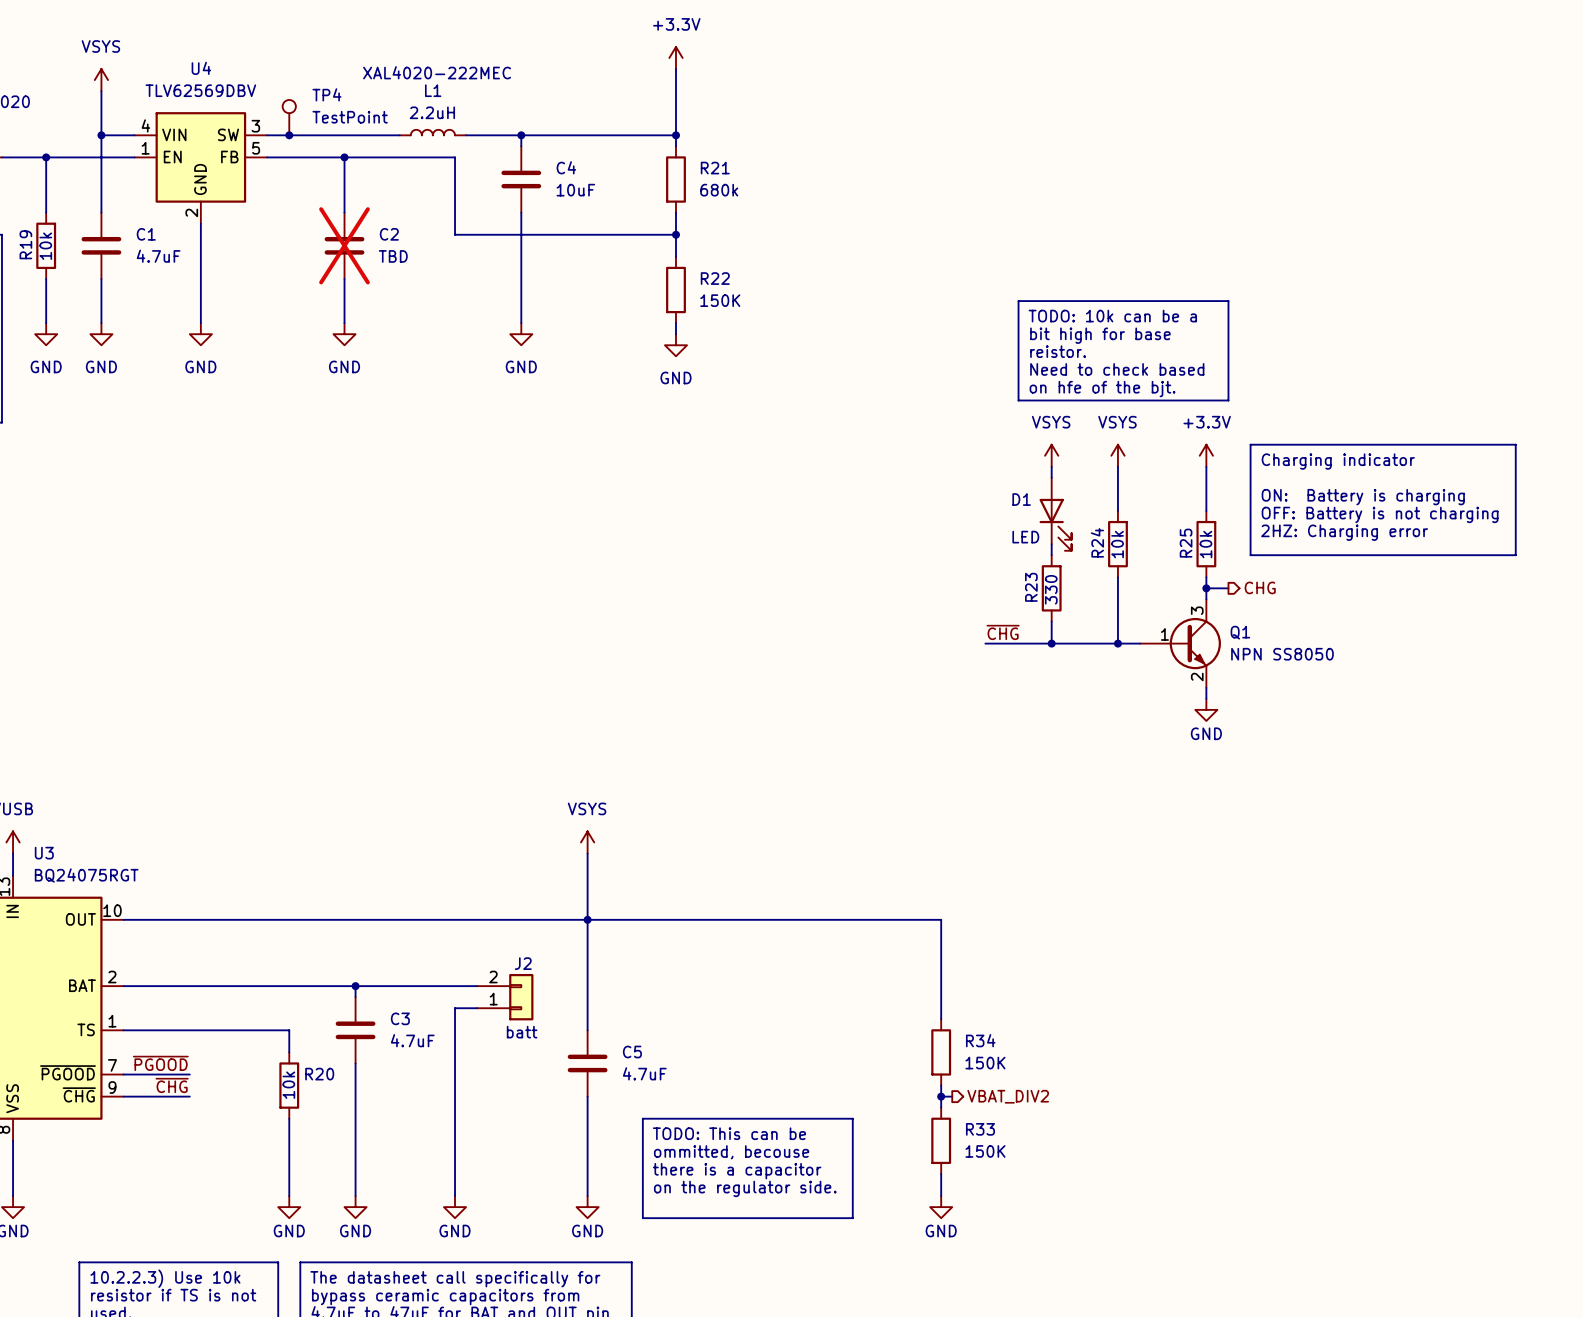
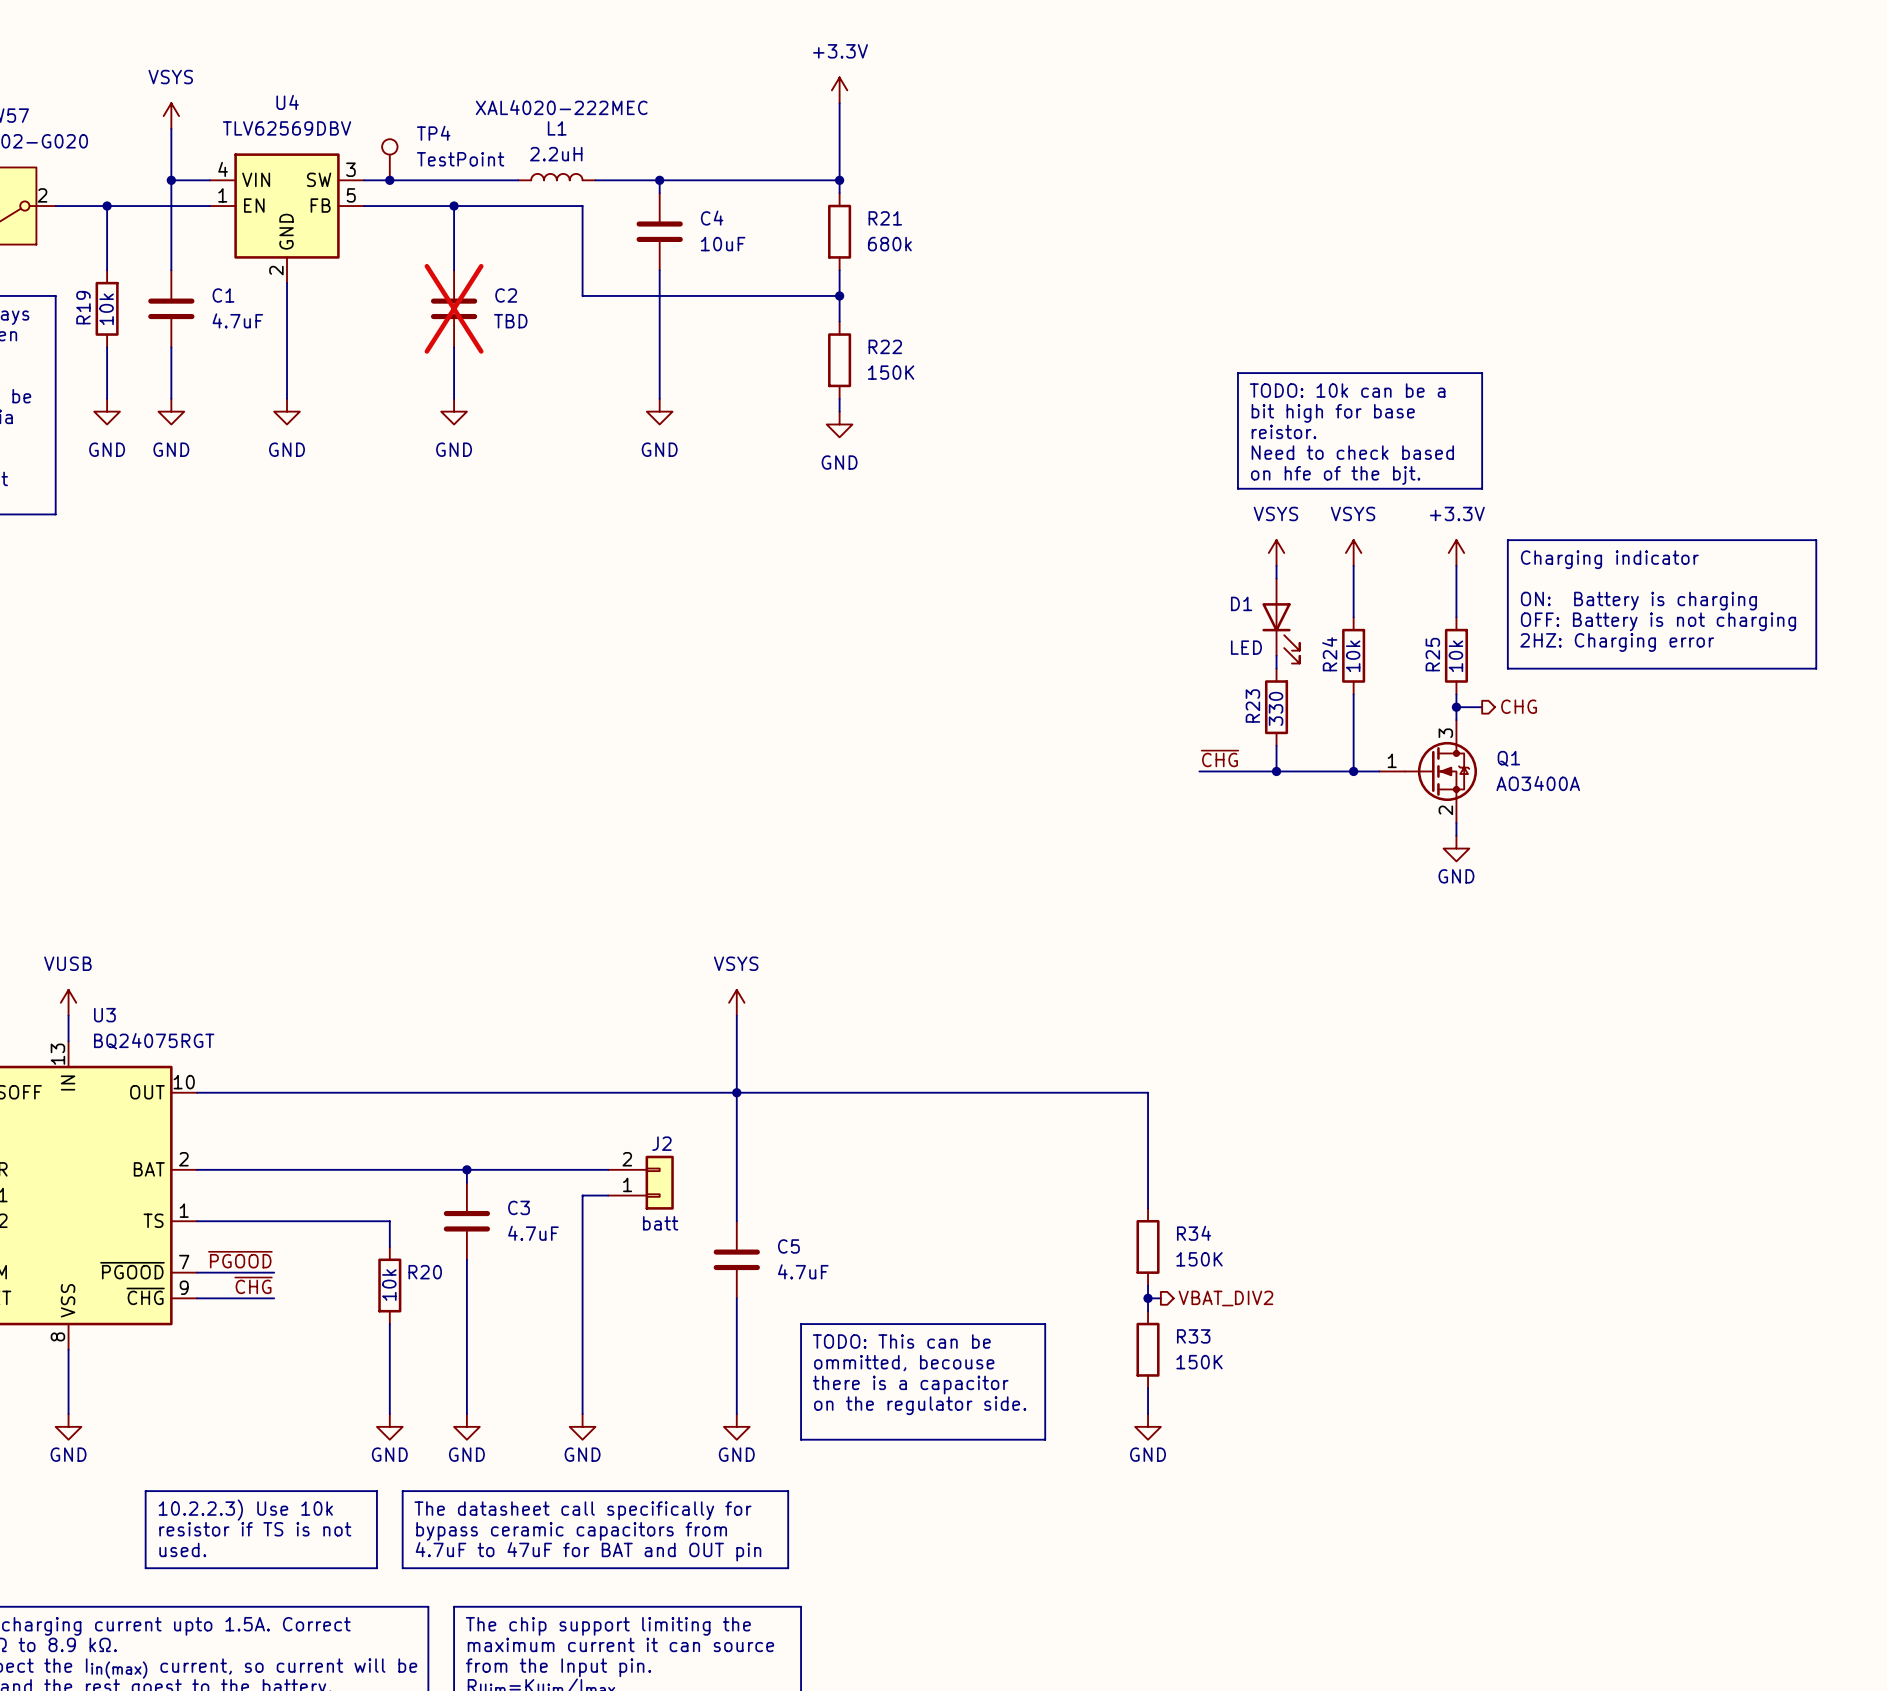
Q1 symbol: [1140, 599, 1221, 688] -> [1379, 720, 1478, 823]
Q1 value: NPN SS8050 (1282, 654) -> AO3400A (1538, 783)

